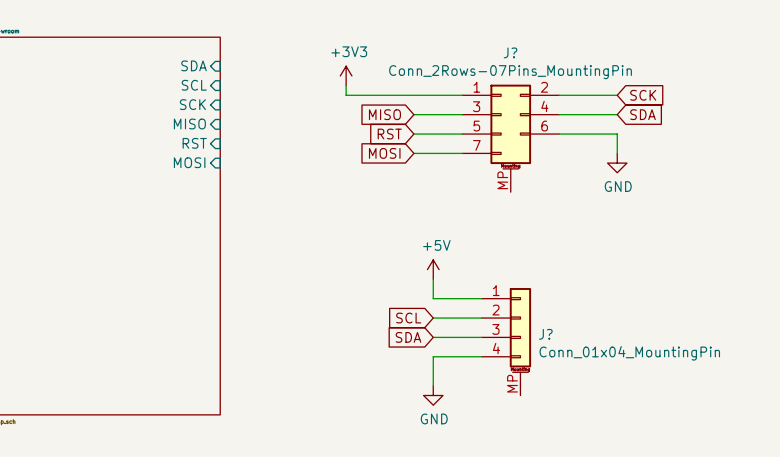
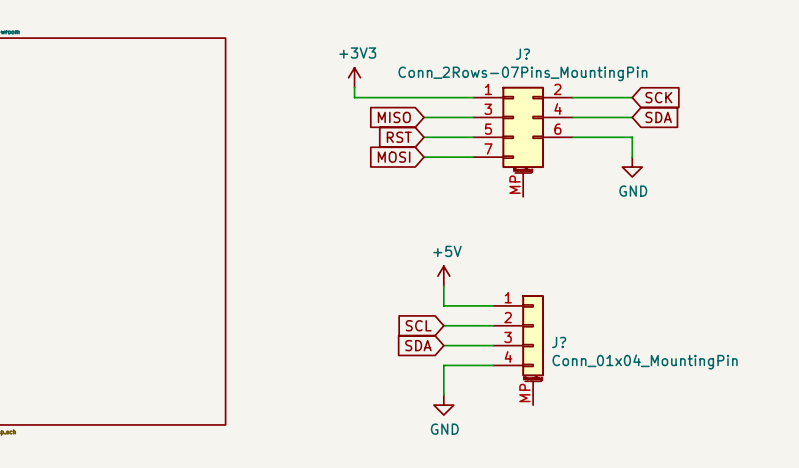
sheet pin: SDA (194, 65) -> none
sheet pin: SCL (194, 85) -> none
sheet pin: SCK (192, 104) -> none
sheet pin: MISO (189, 123) -> none
sheet pin: RST (194, 143) -> none
sheet pin: MOSI (189, 162) -> none

